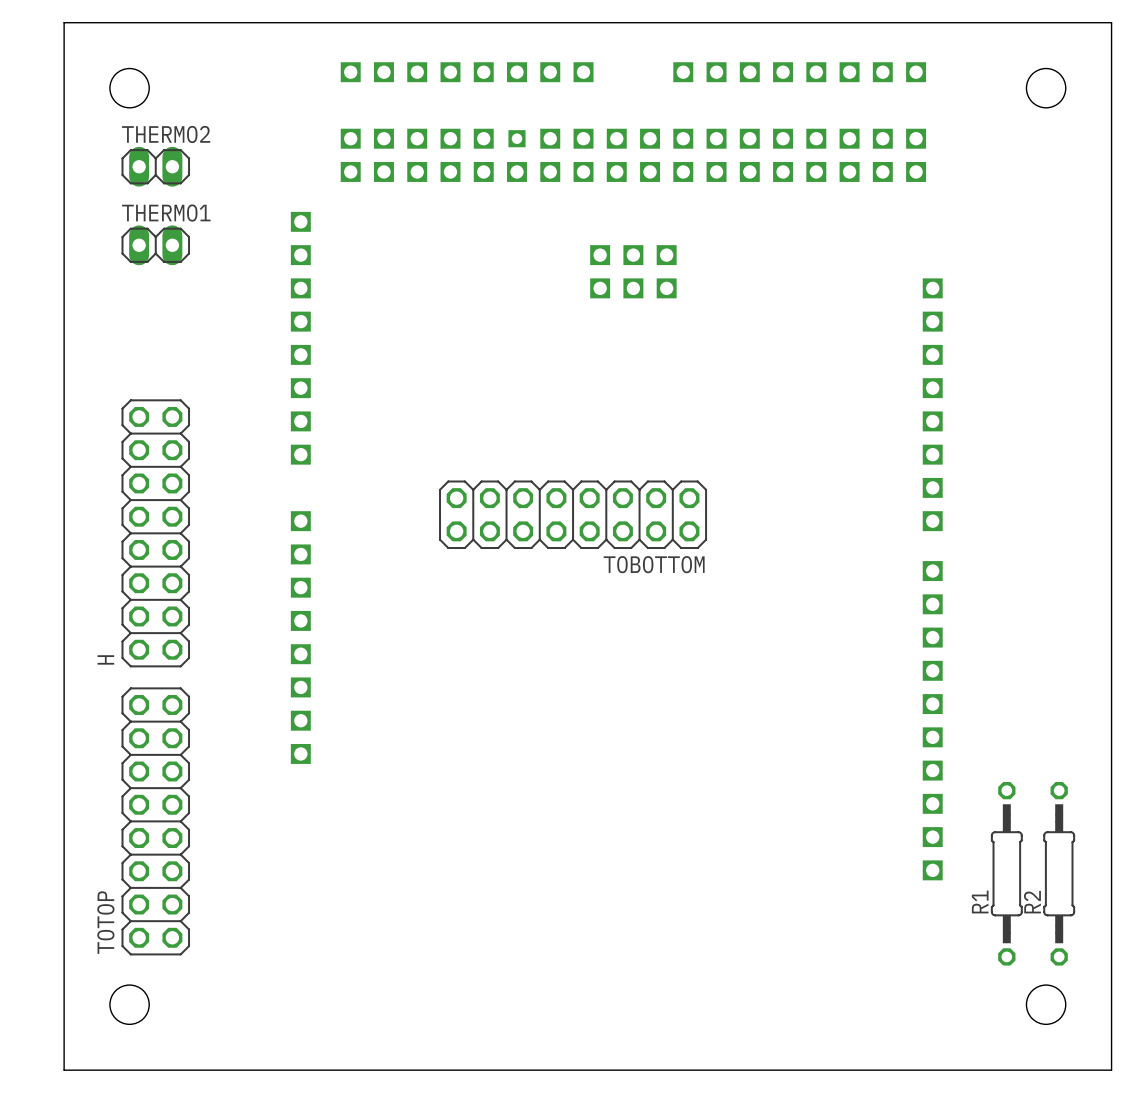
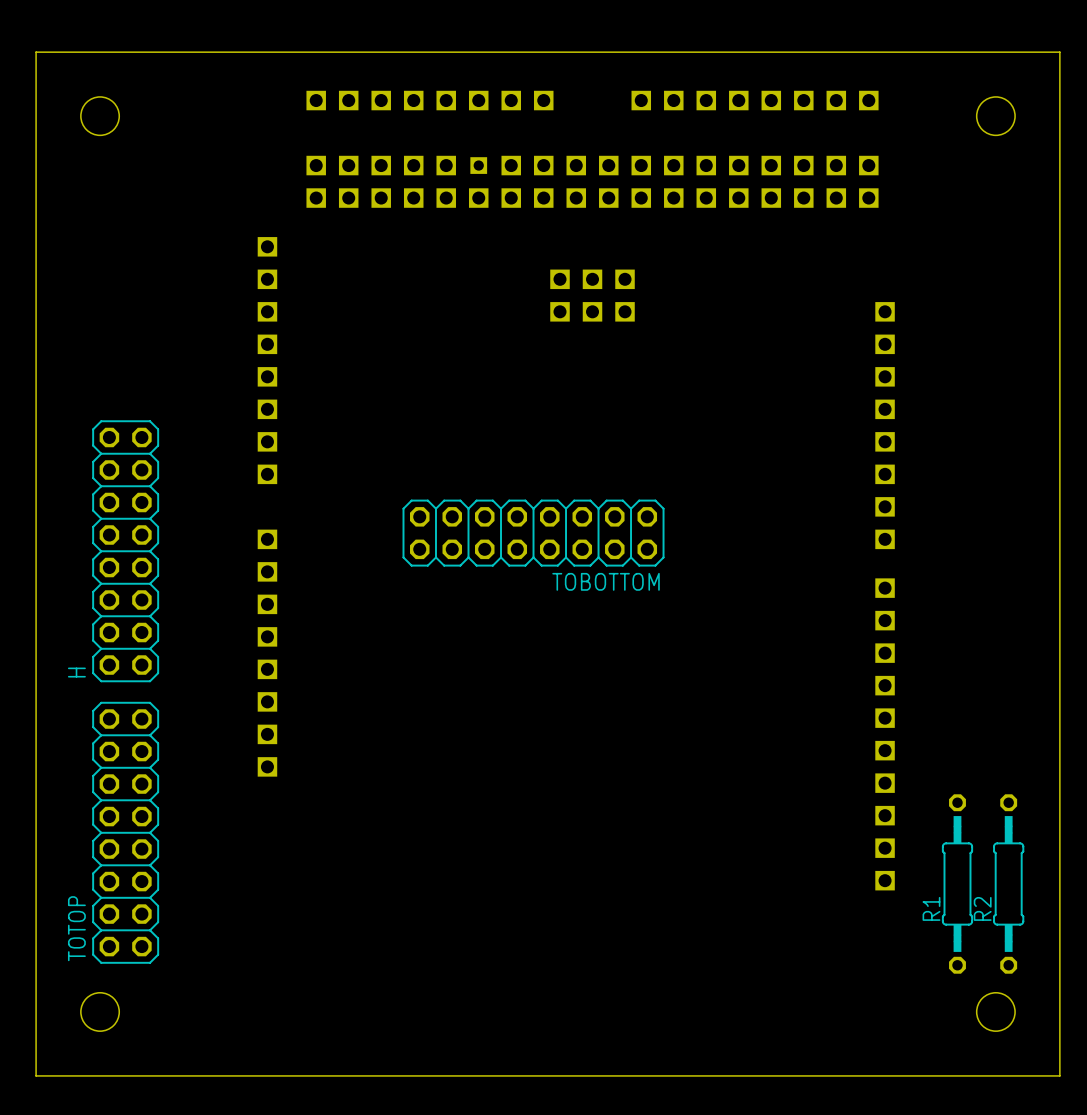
THERMO2: (155, 166) -> none
THERMO1: (155, 245) -> none

